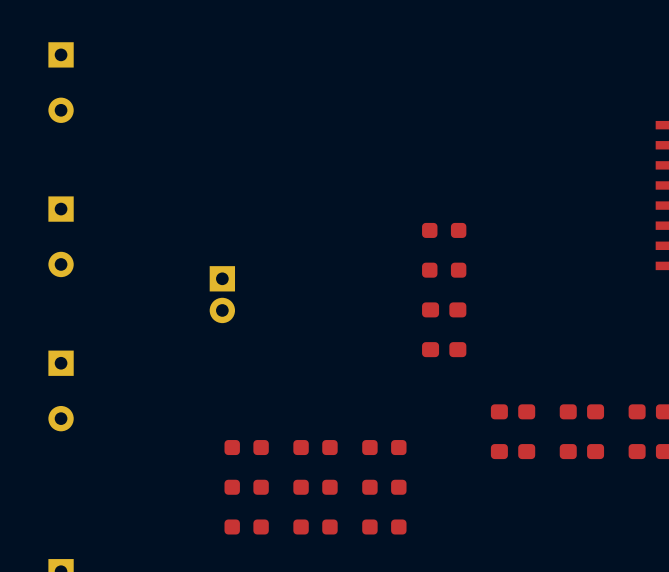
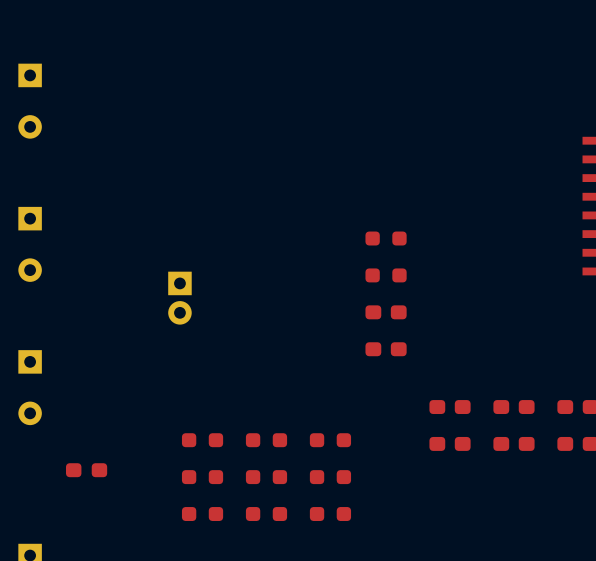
part: none -> (86, 470)

